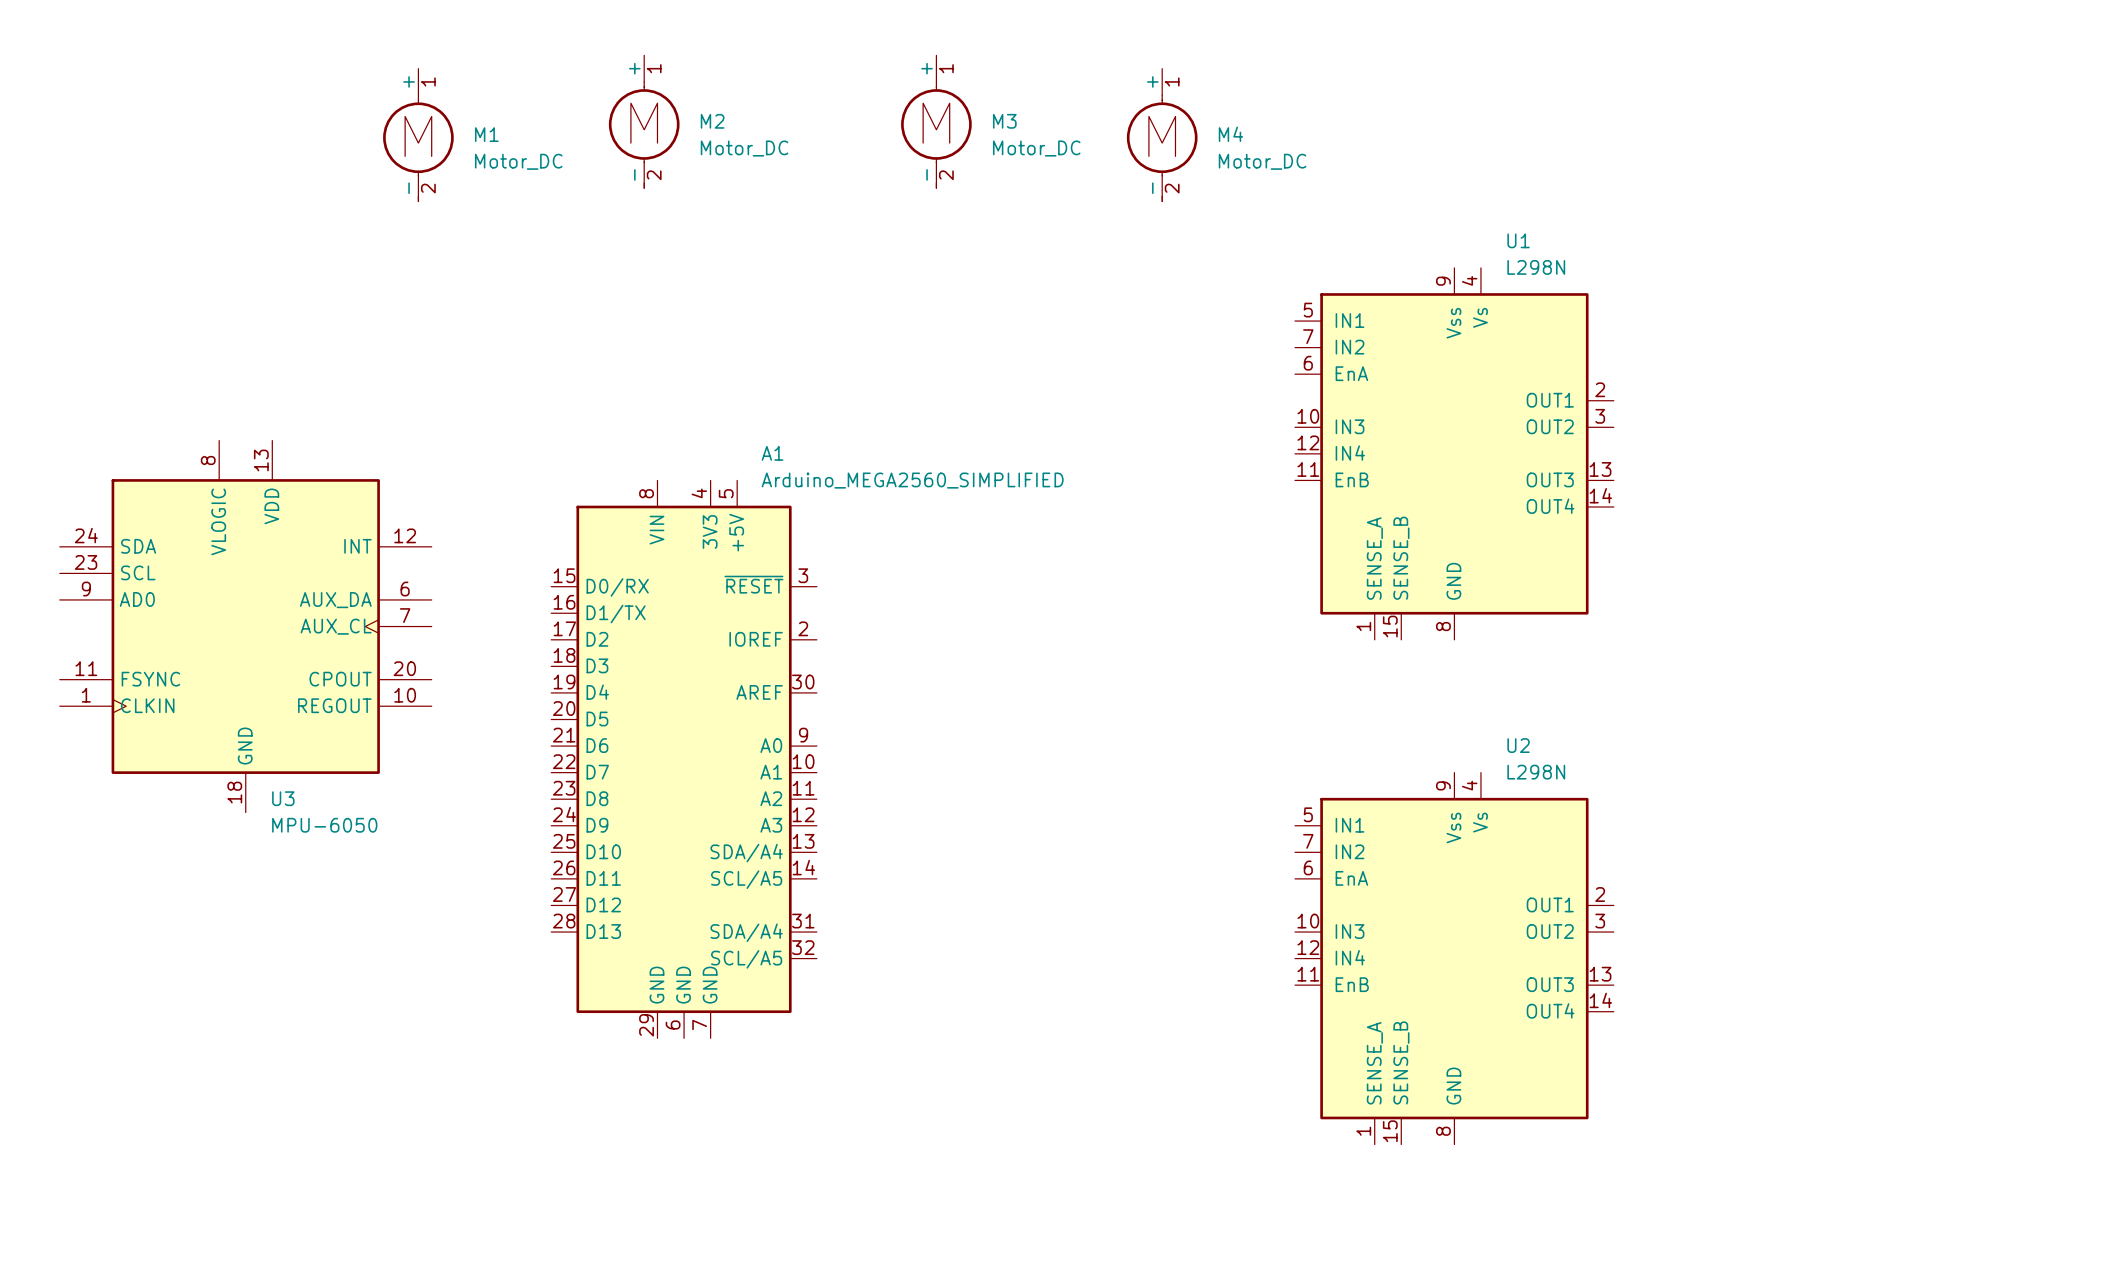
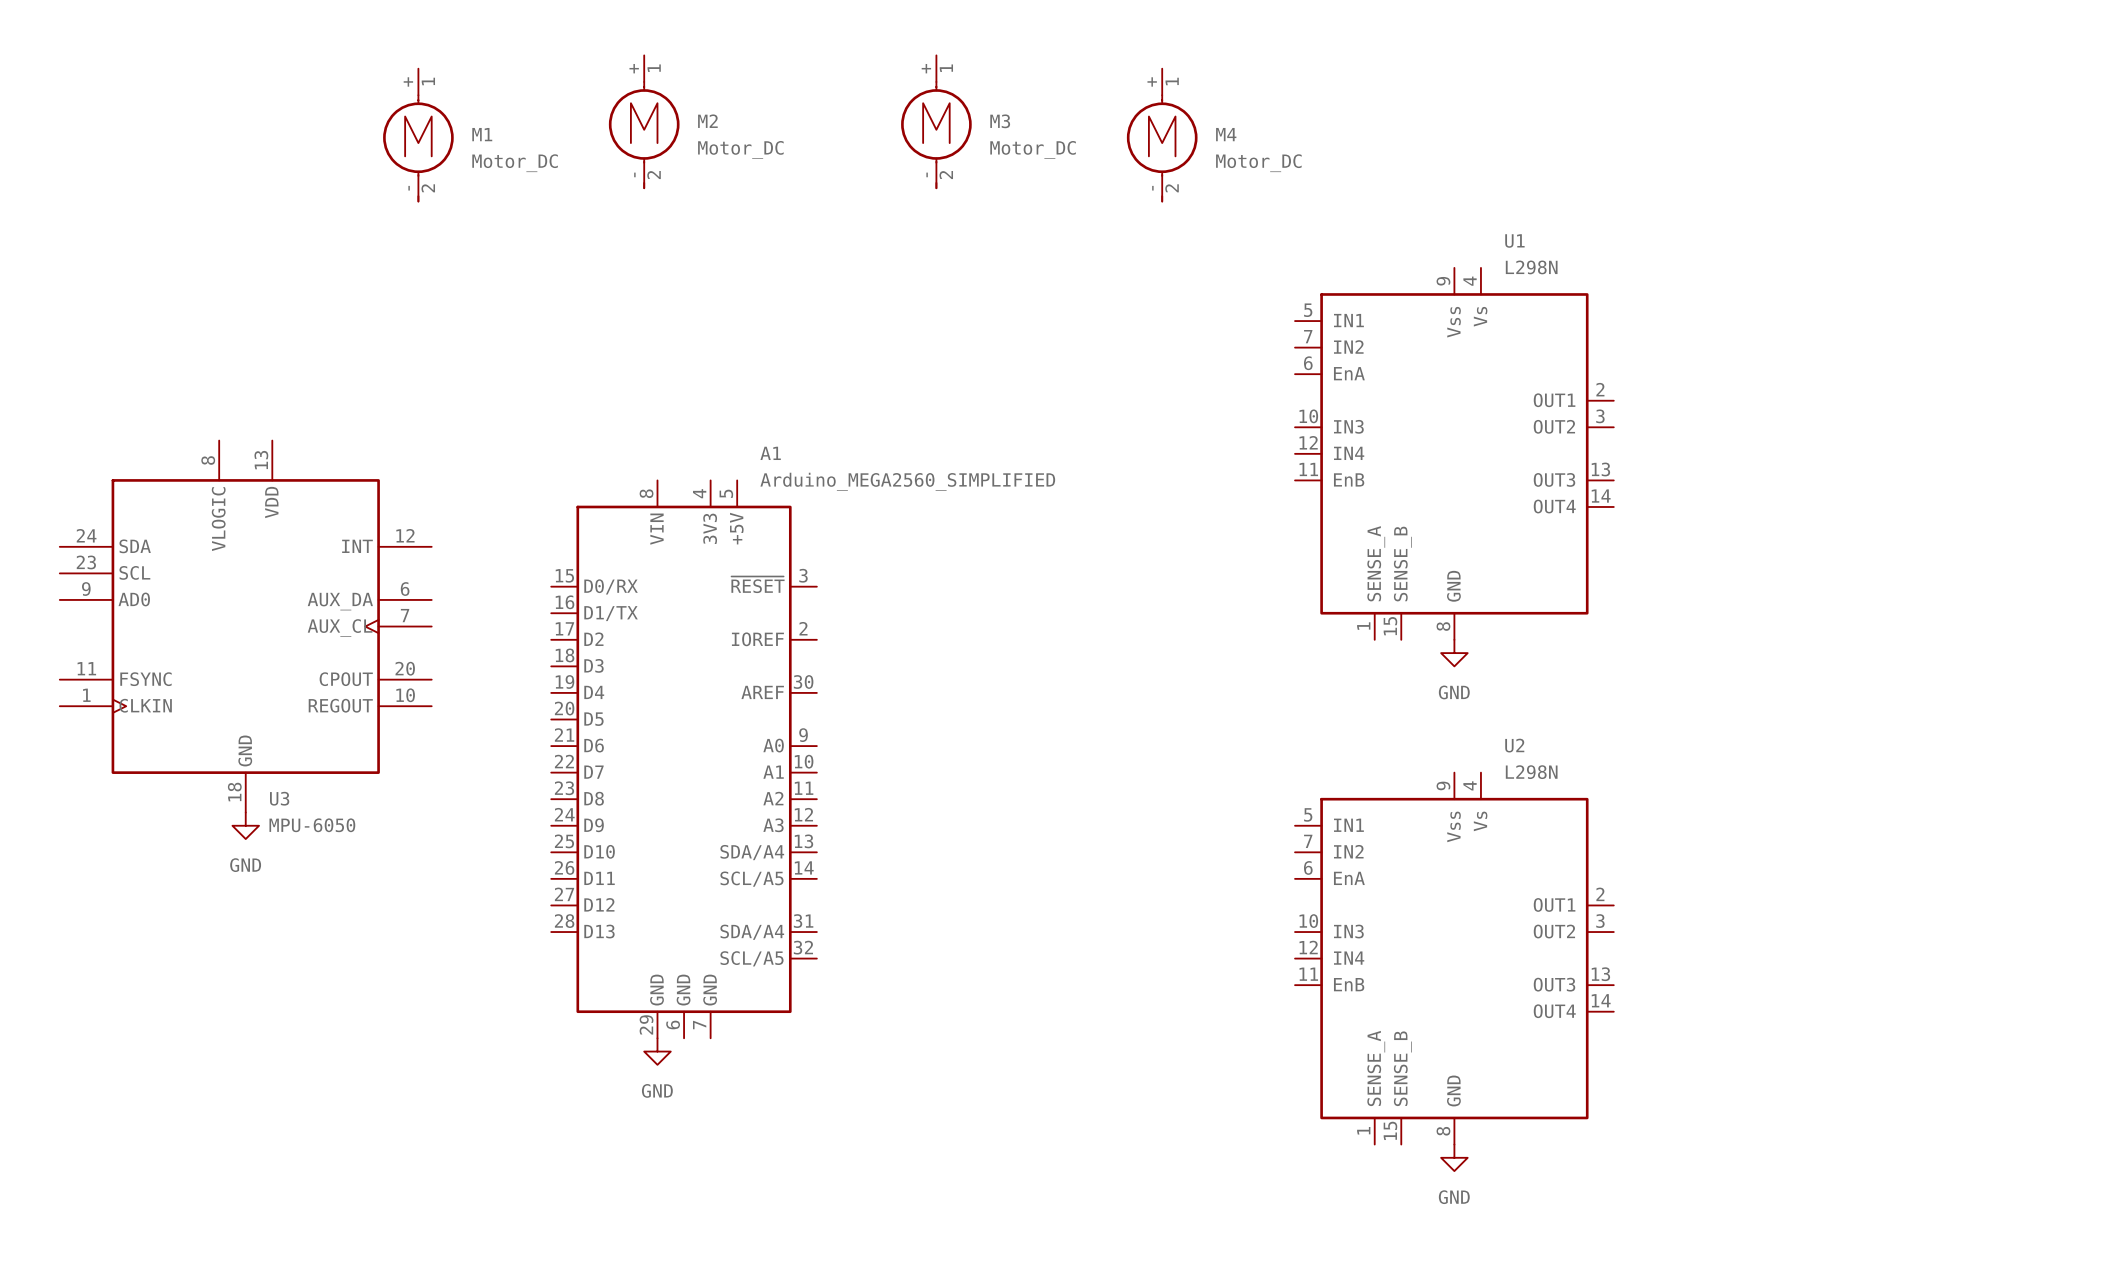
power symbol: none -> GND (1454, 653)
power symbol: none -> GND (245, 825)
power symbol: none -> GND (657, 1051)
power symbol: none -> GND (1454, 1157)

